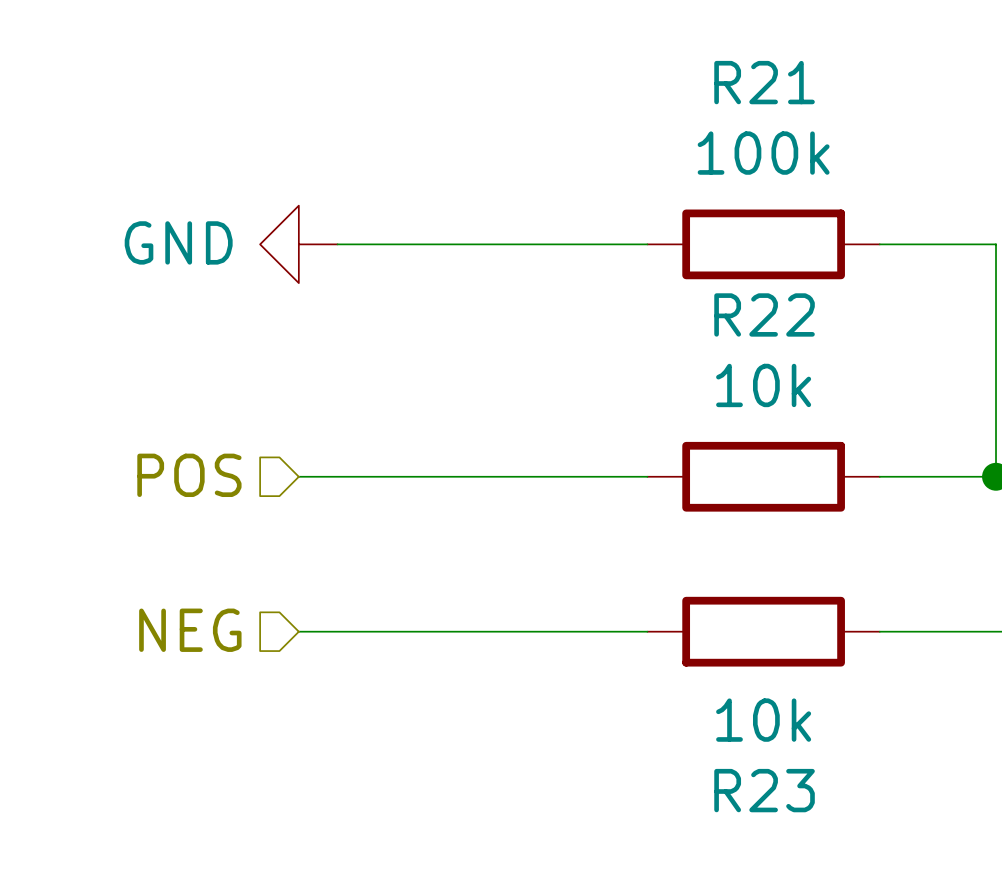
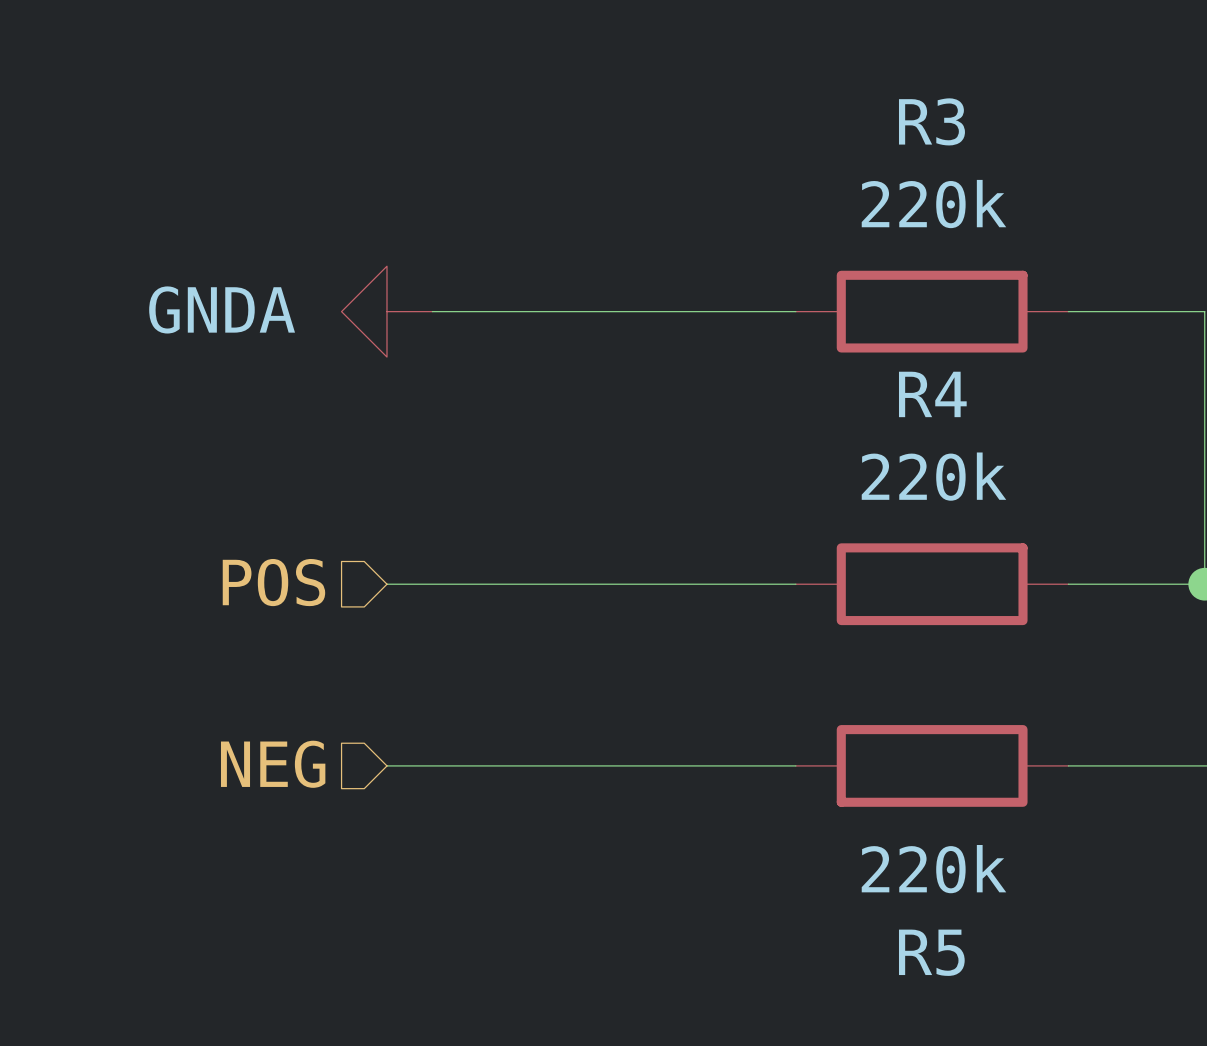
R21 name: R21 (764, 82) -> R3 (931, 121)
R21 value: 100k (763, 153) -> 220k (933, 204)
power symbol: GND (298, 244) -> GNDA (386, 311)
R22 name: R22 (764, 314) -> R4 (932, 394)
R22 value: 10k (763, 385) -> 220k (933, 476)
R23 value: 10k (763, 720) -> 220k (933, 869)
R23 name: R23 (764, 790) -> R5 (931, 952)

